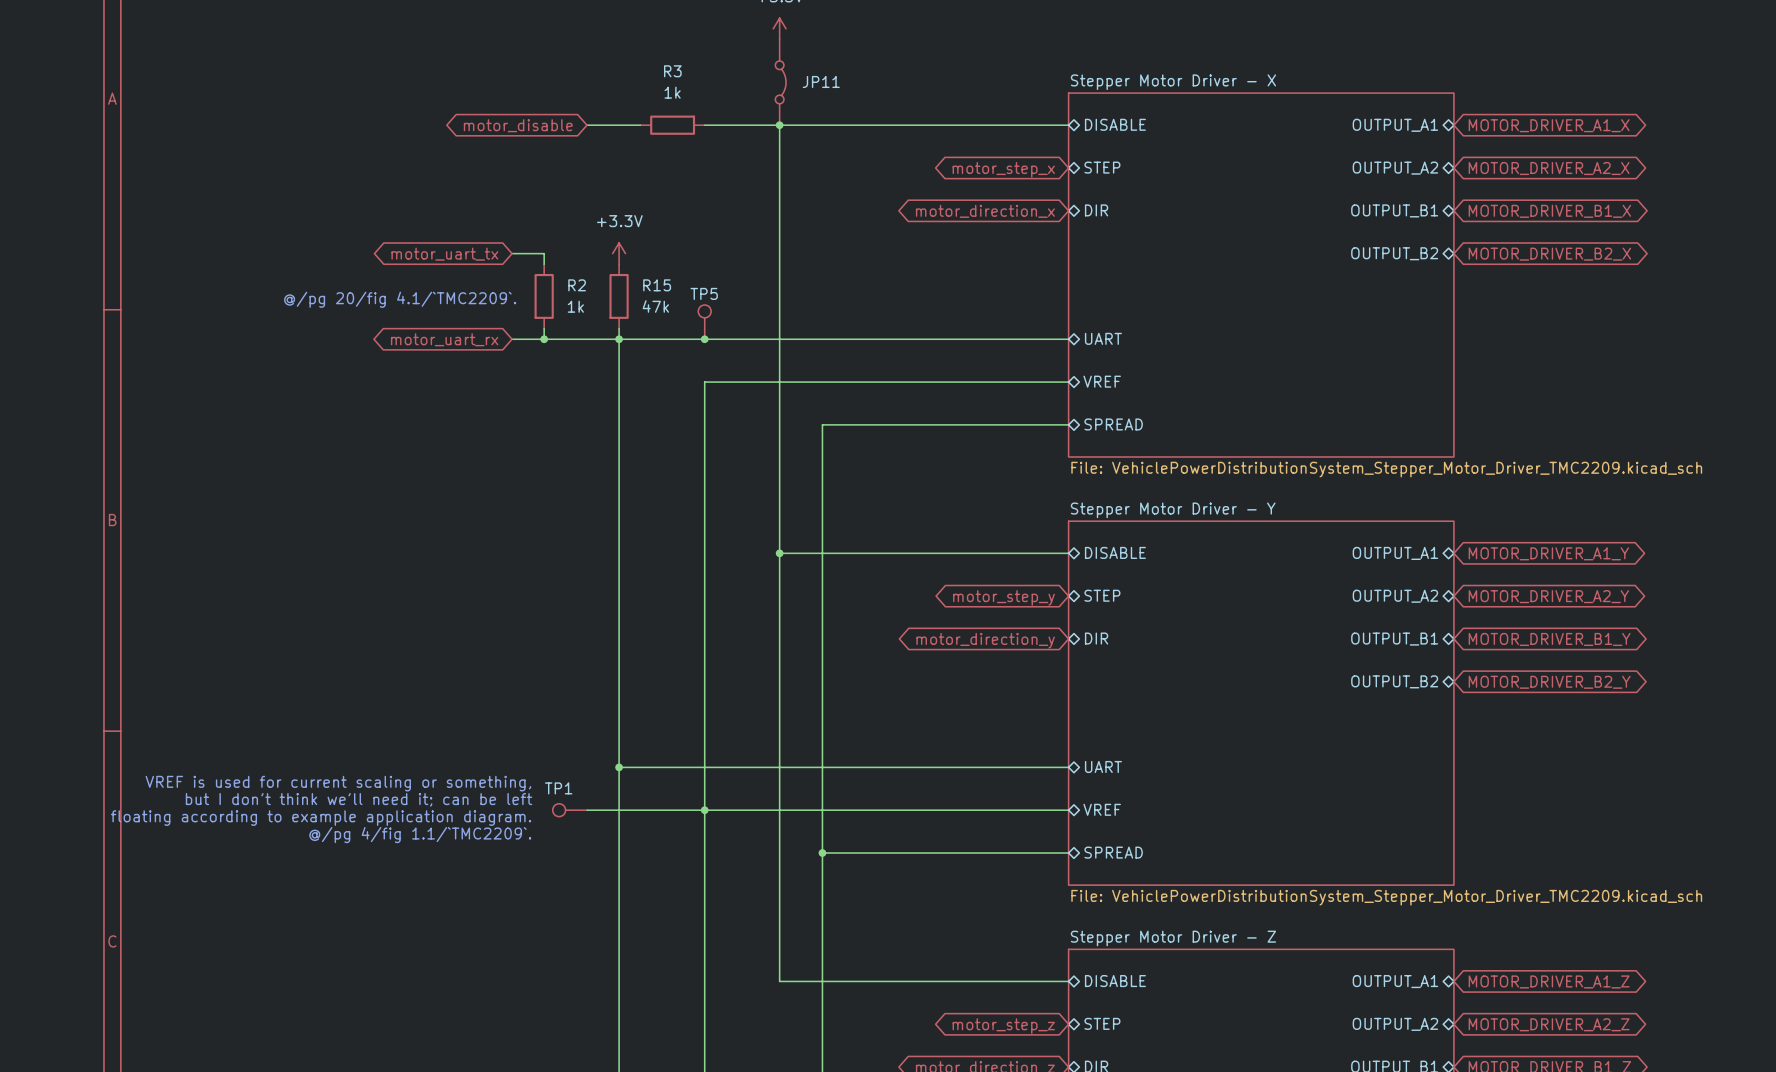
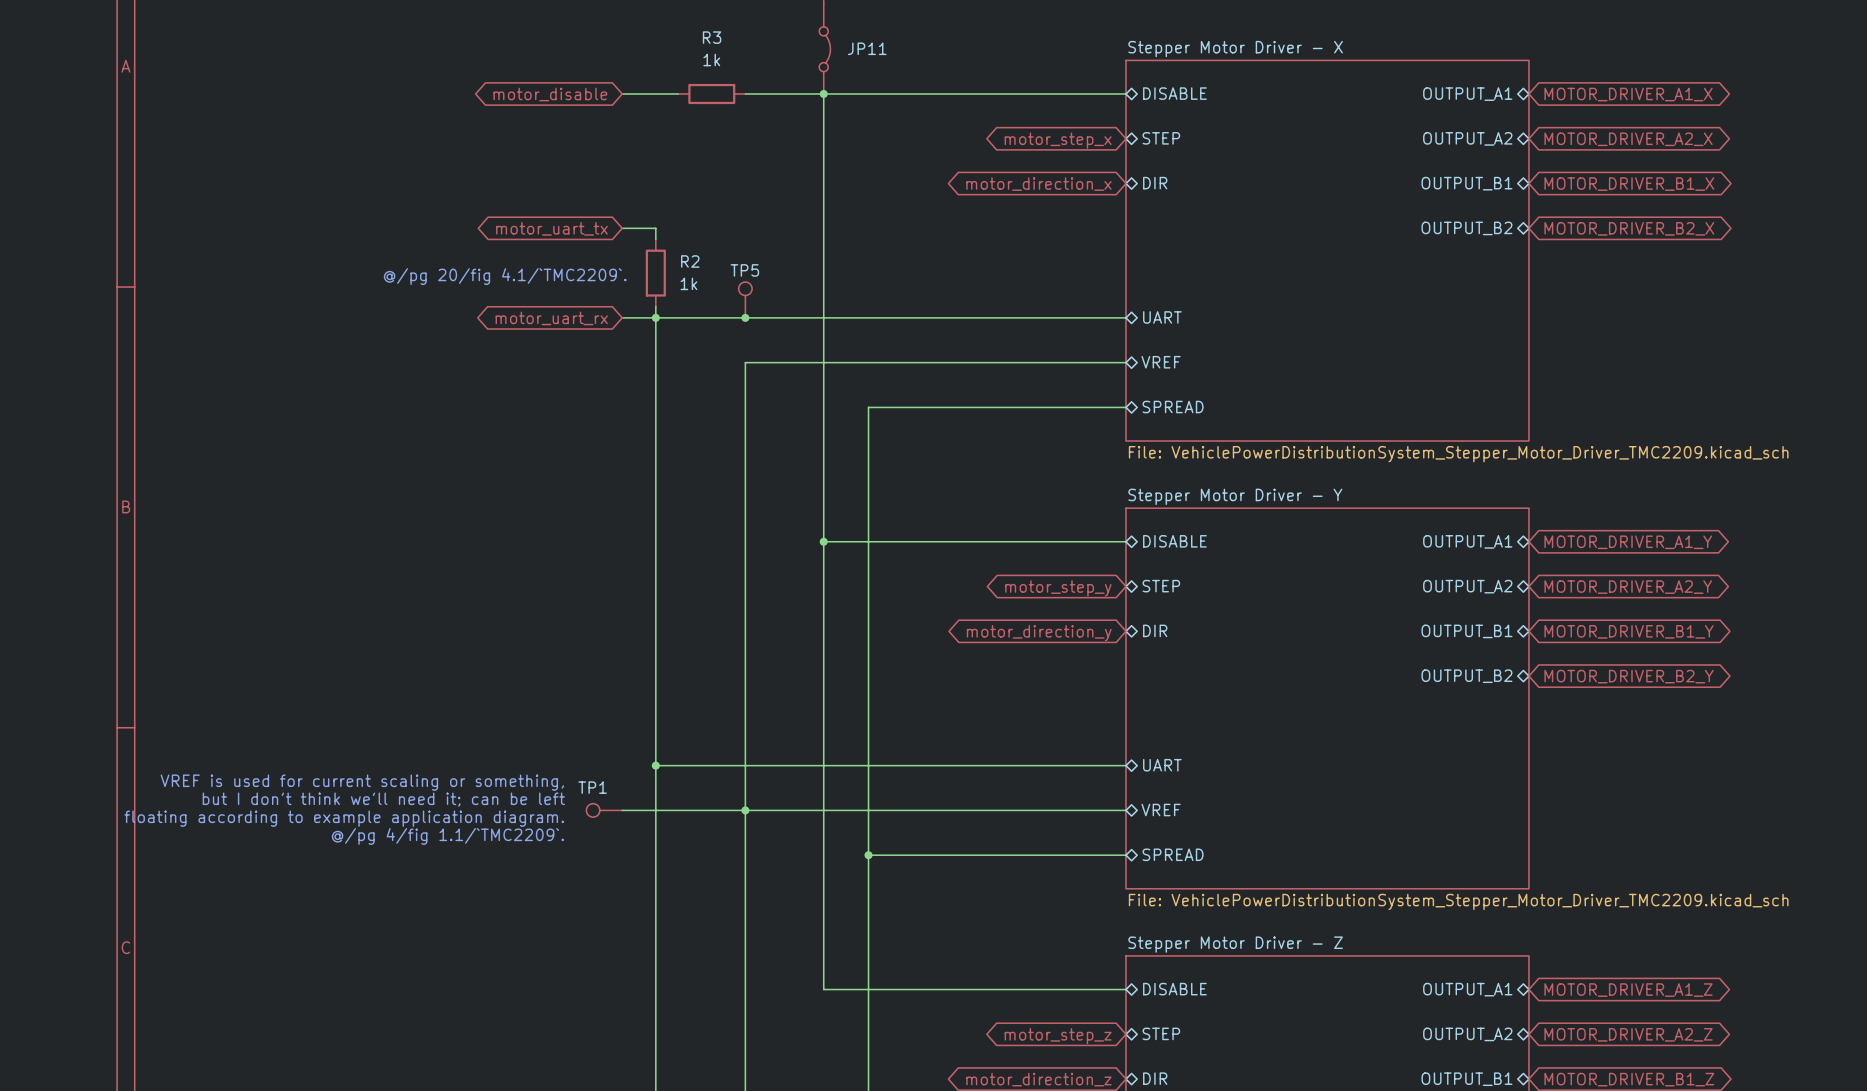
wire: (512, 253) (544, 253) (544, 264) -> (622, 228) (655, 228) (655, 239)
power symbol: +3.3V (619, 253) -> none
global label position: motor_uart_tx (444, 254) -> motor_uart_tx (551, 228)
R15 name: R15 (657, 285) -> R2 (690, 261)
R2: 1k (544, 296) -> none
text position: @/pg 20/fig 4.1/`TMC2209`. (400, 299) -> @/pg 20/fig 4.1/`TMC2209`. (505, 276)
R15 value: 47k (655, 306) -> 1k (688, 283)
wire: (544, 328) (544, 339) -> none
global label position: motor_uart_rx (444, 339) -> motor_uart_rx (551, 318)
wire: (512, 339) (586, 339) -> none
junction: (544, 339) -> none

